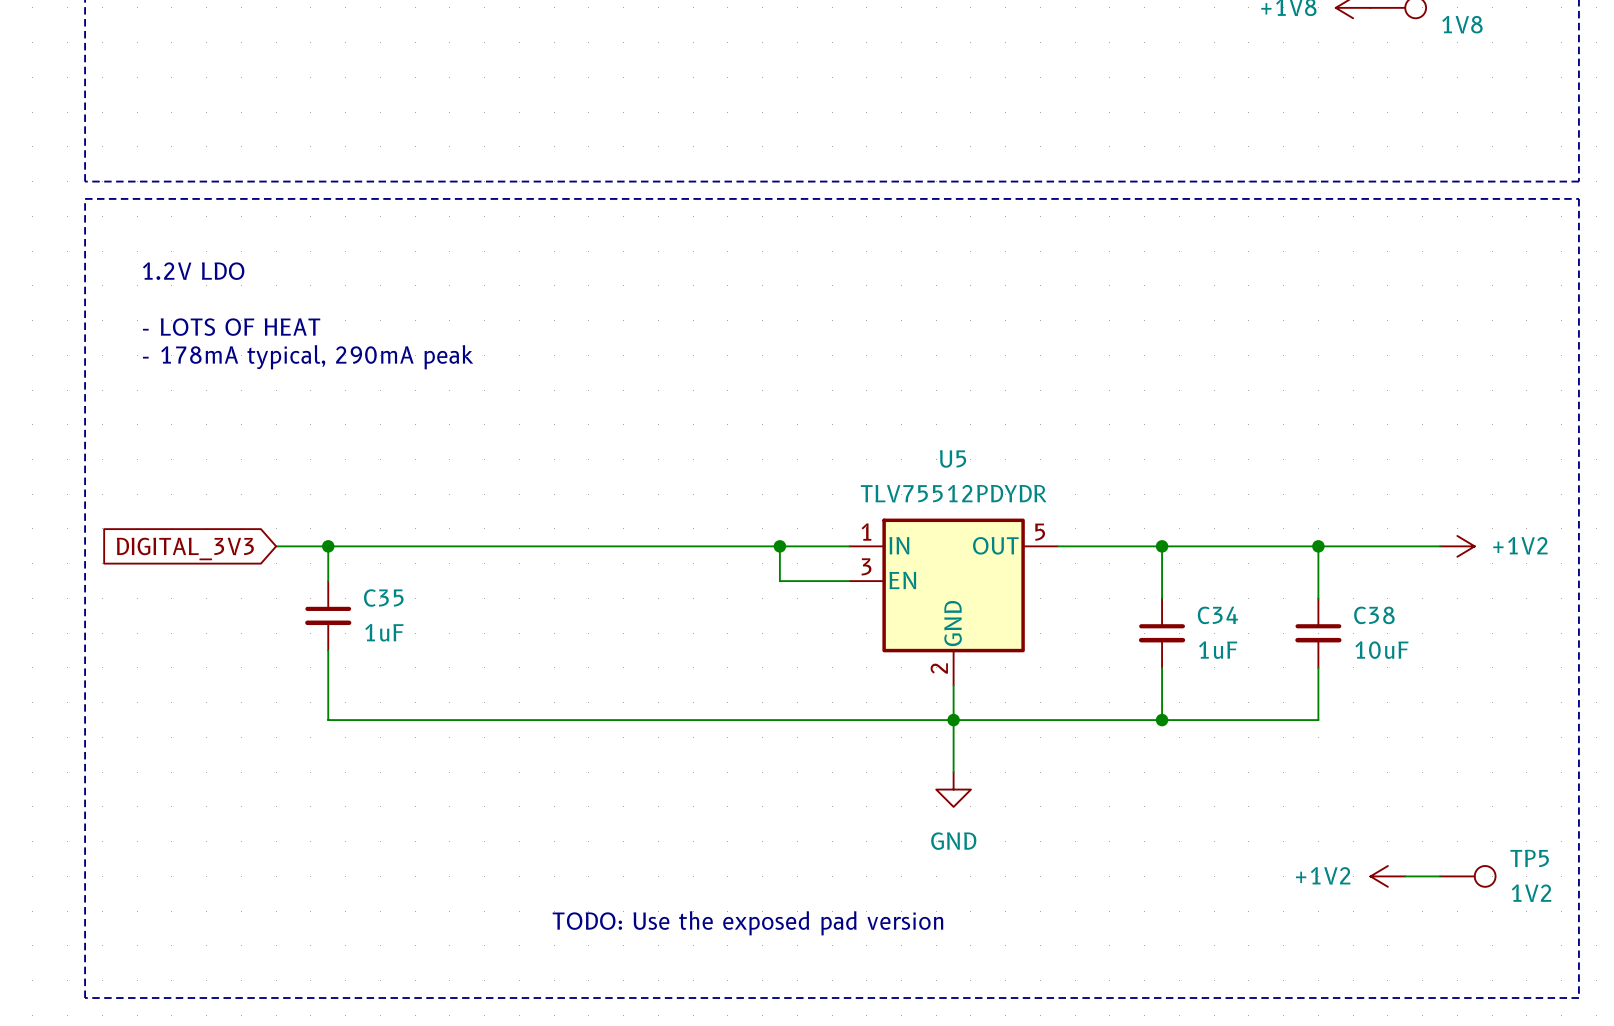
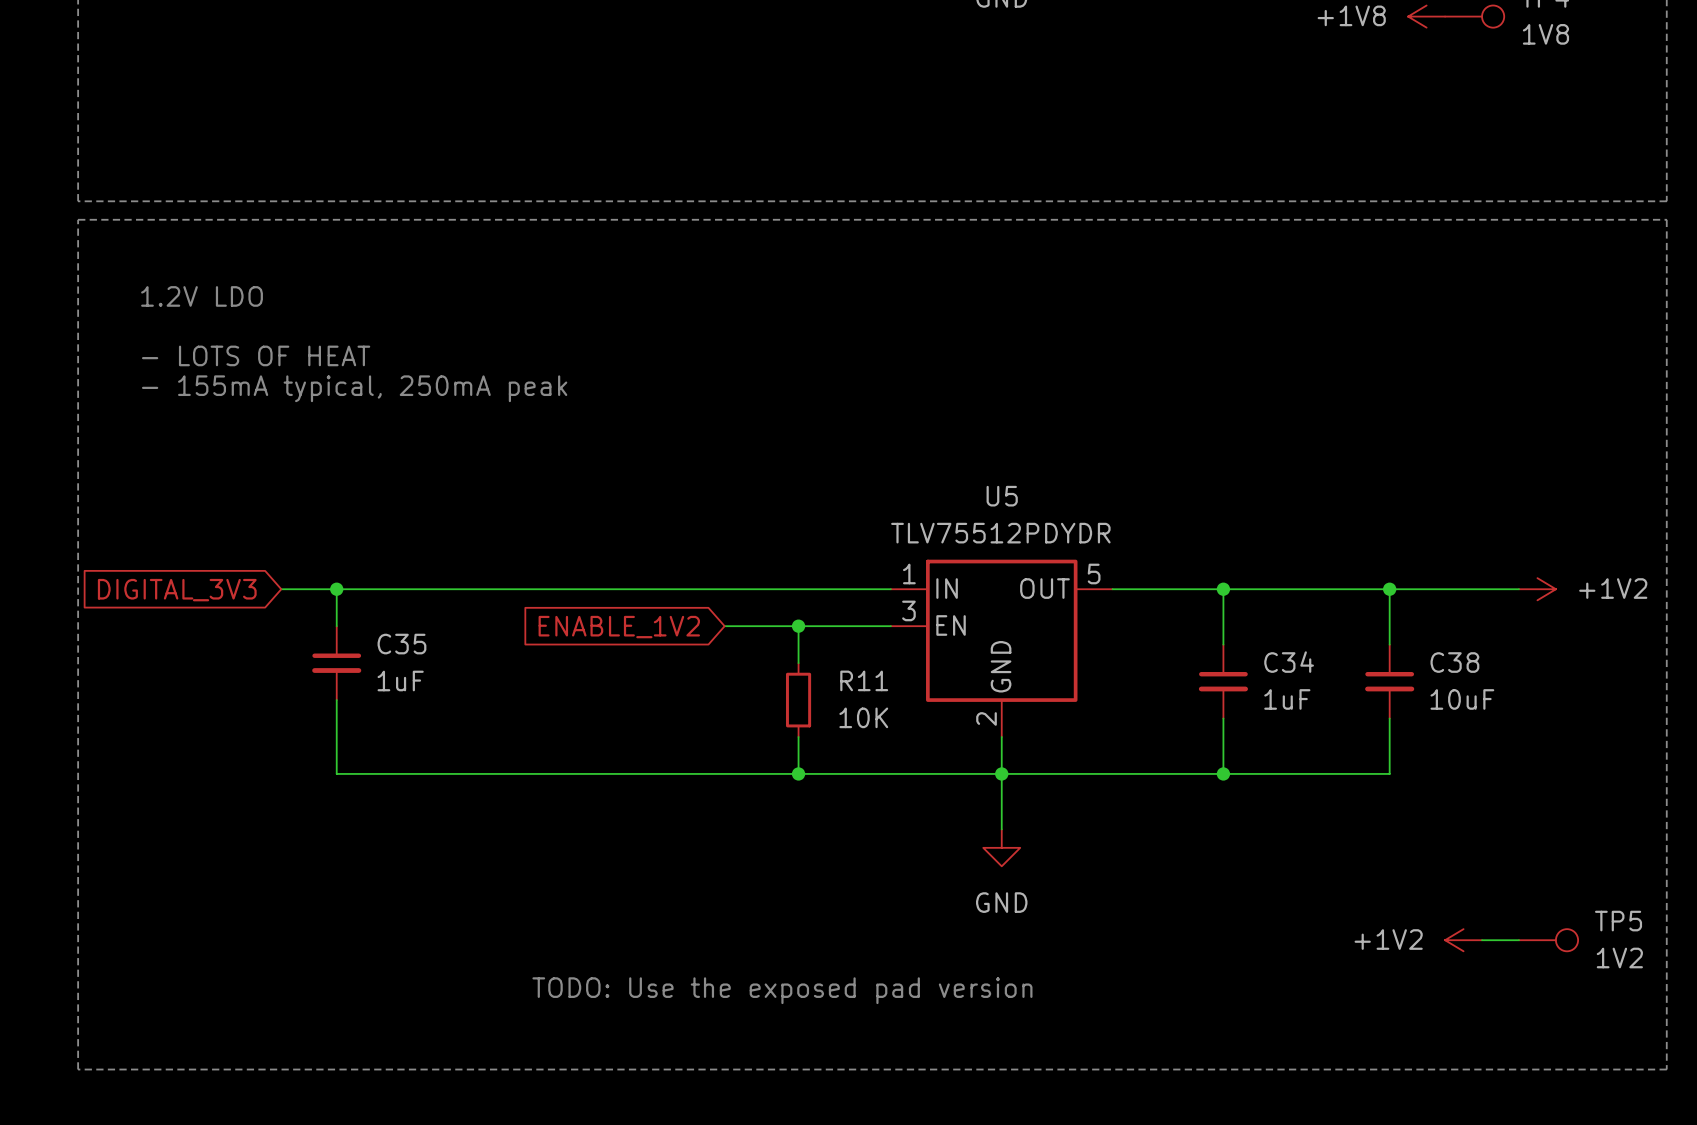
text: - 178mA typical, 290mA peak (308, 357) -> - 155mA typical, 250mA peak (354, 388)
wire: (779, 546) (779, 581) -> (724, 626) (817, 626)
junction position: (779, 546) -> (798, 626)
wire: none -> (798, 626) (798, 663)
global label: none -> ENABLE_1V2 (619, 627)
R11: none -> 10K (798, 700)
wire: none -> (798, 737) (798, 773)
junction: none -> (798, 773)

